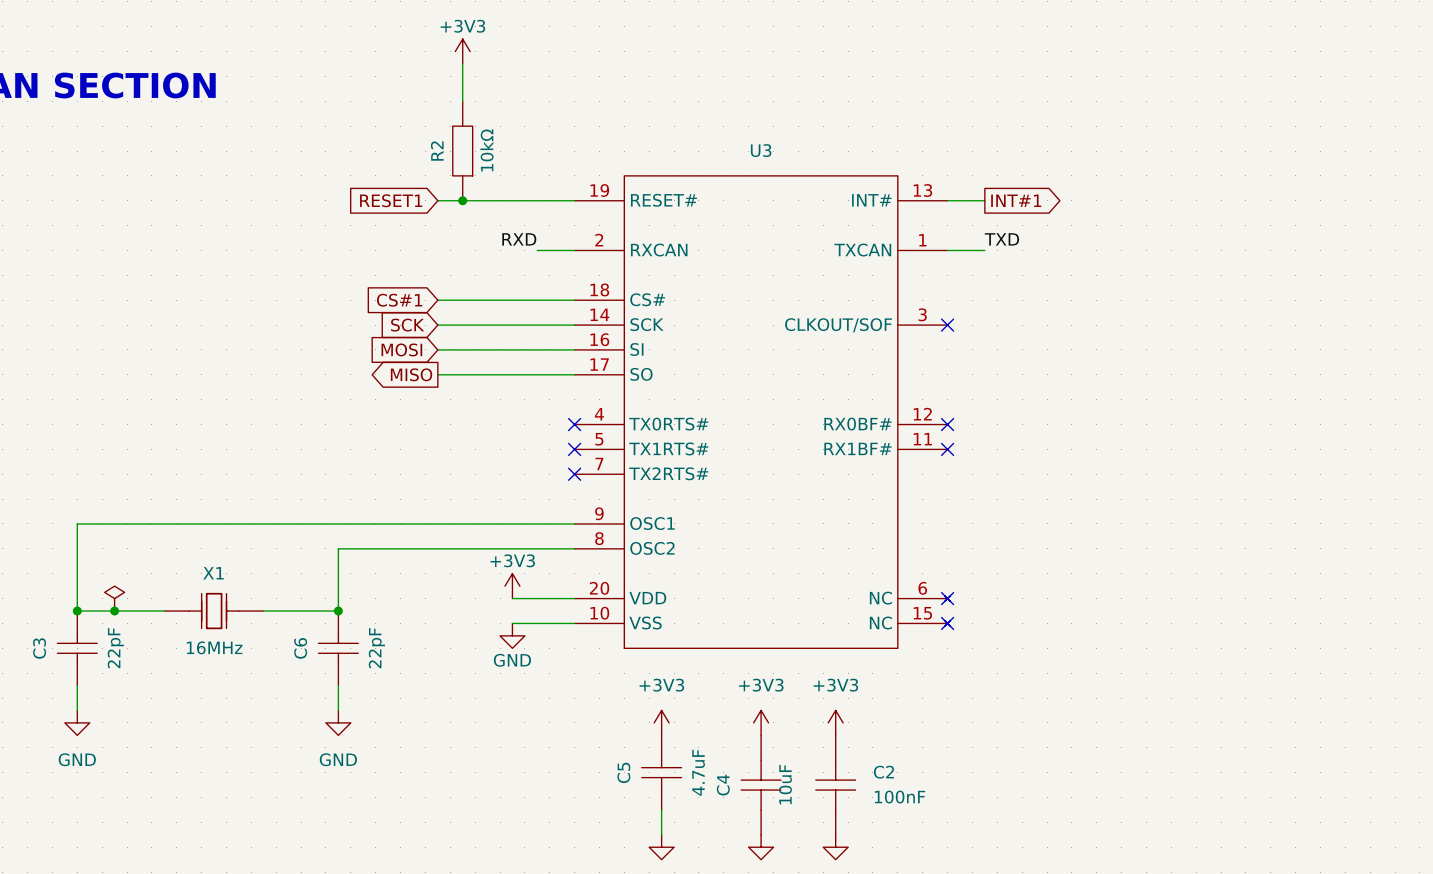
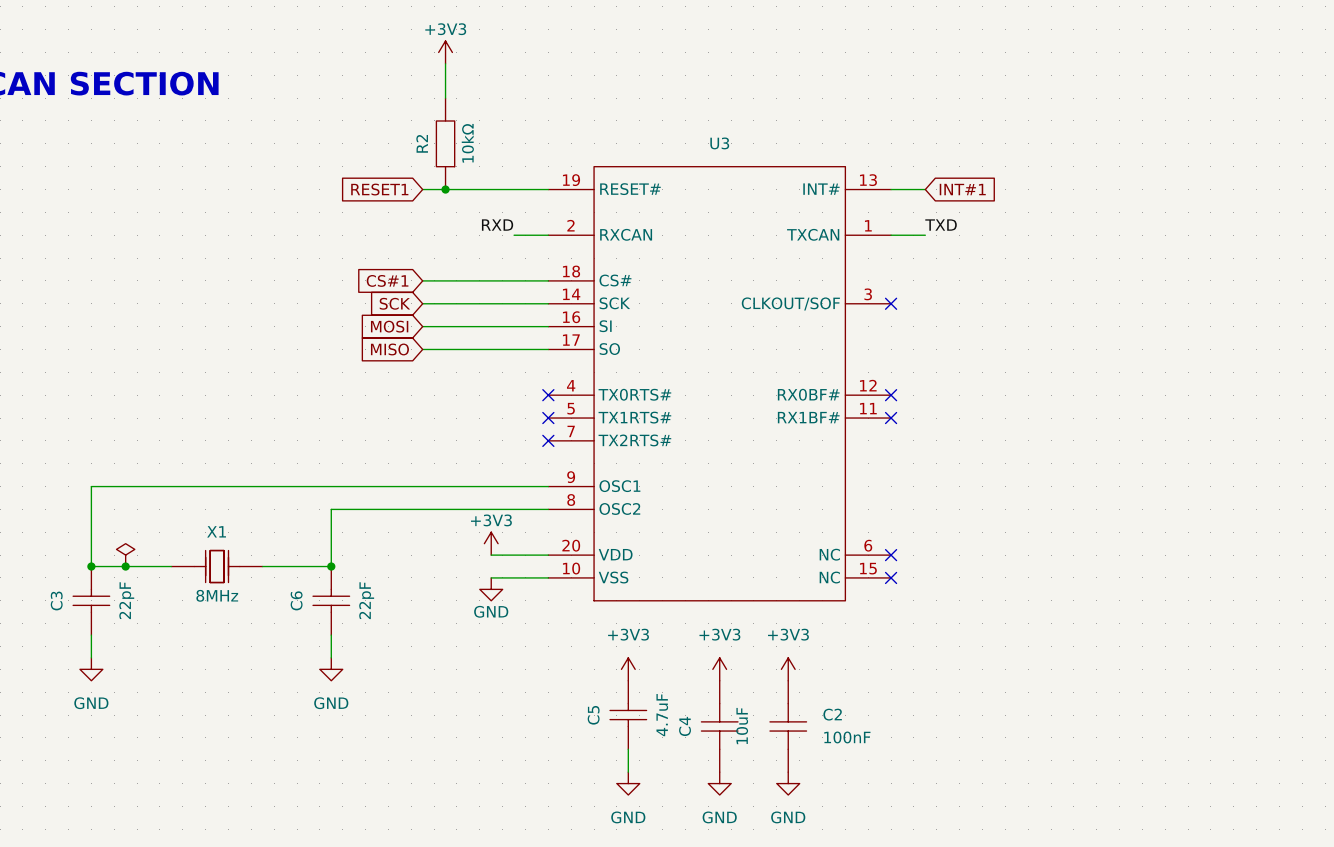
U3 symbol: [574, 175, 951, 649] -> [548, 166, 892, 601]
global label shape: output (1016, 200) -> input (962, 189)
global label shape: output (411, 374) -> input (389, 349)
X1 value: 16MHz (214, 647) -> 8MHz (217, 595)

